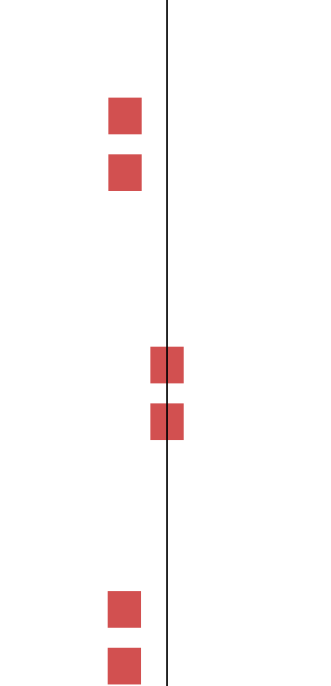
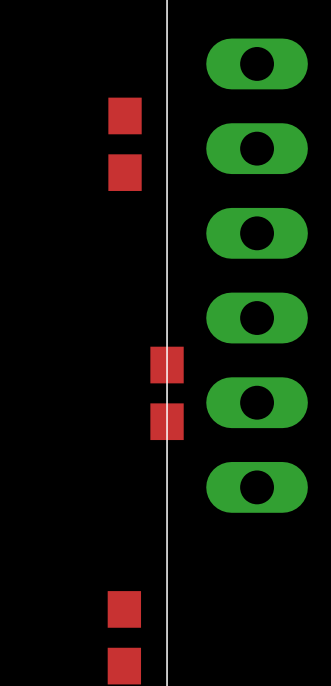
part: none -> (257, 275)

